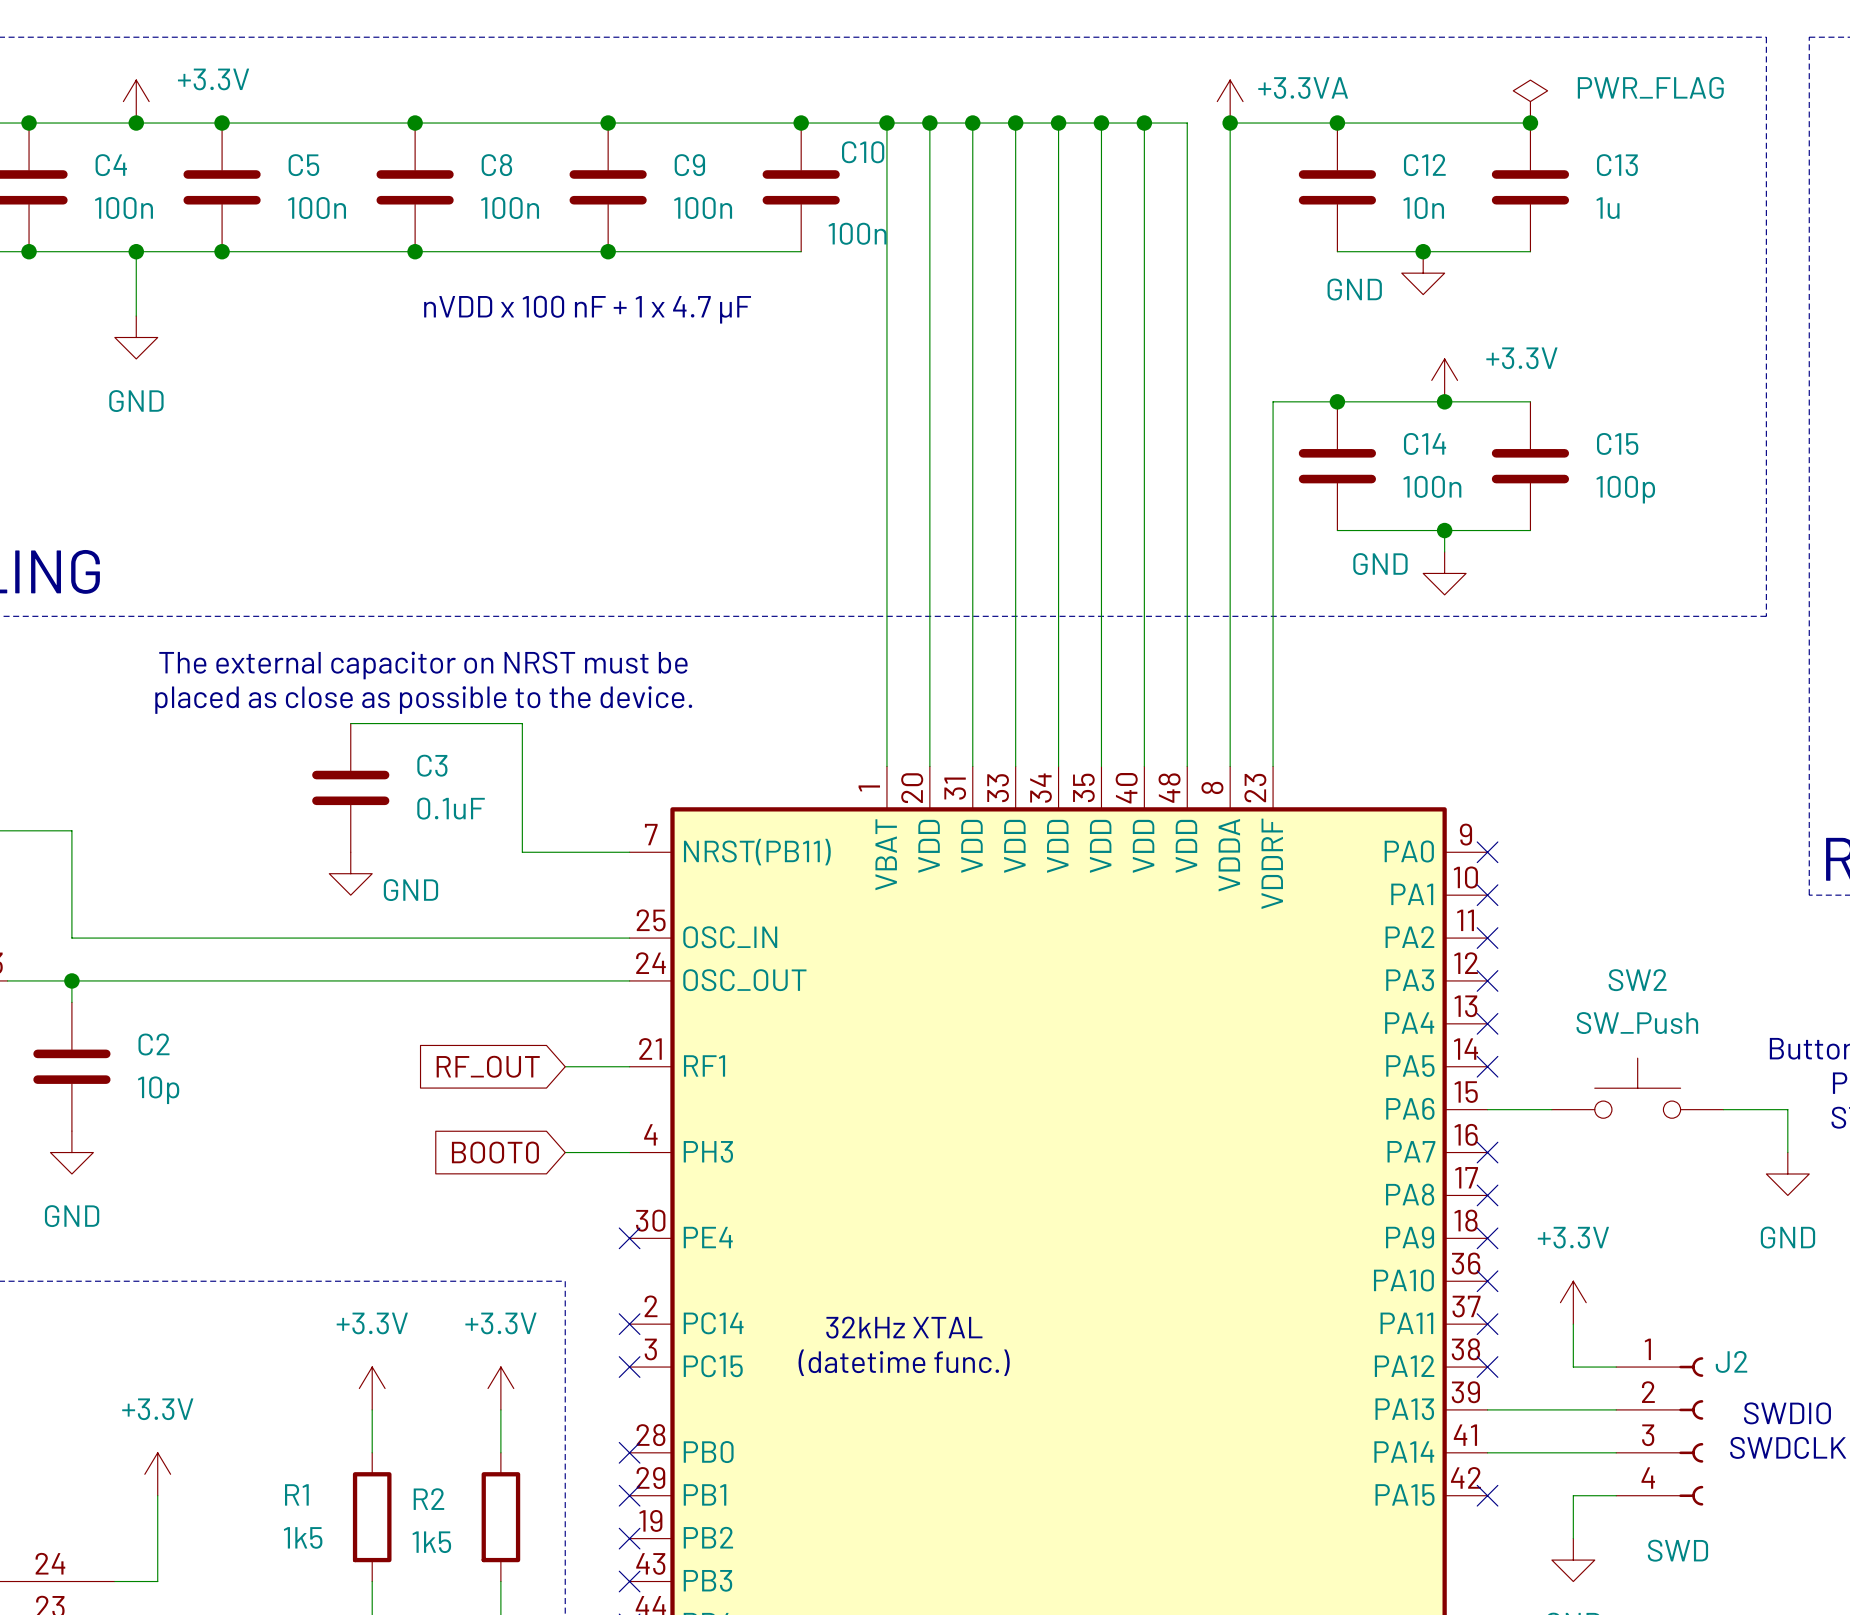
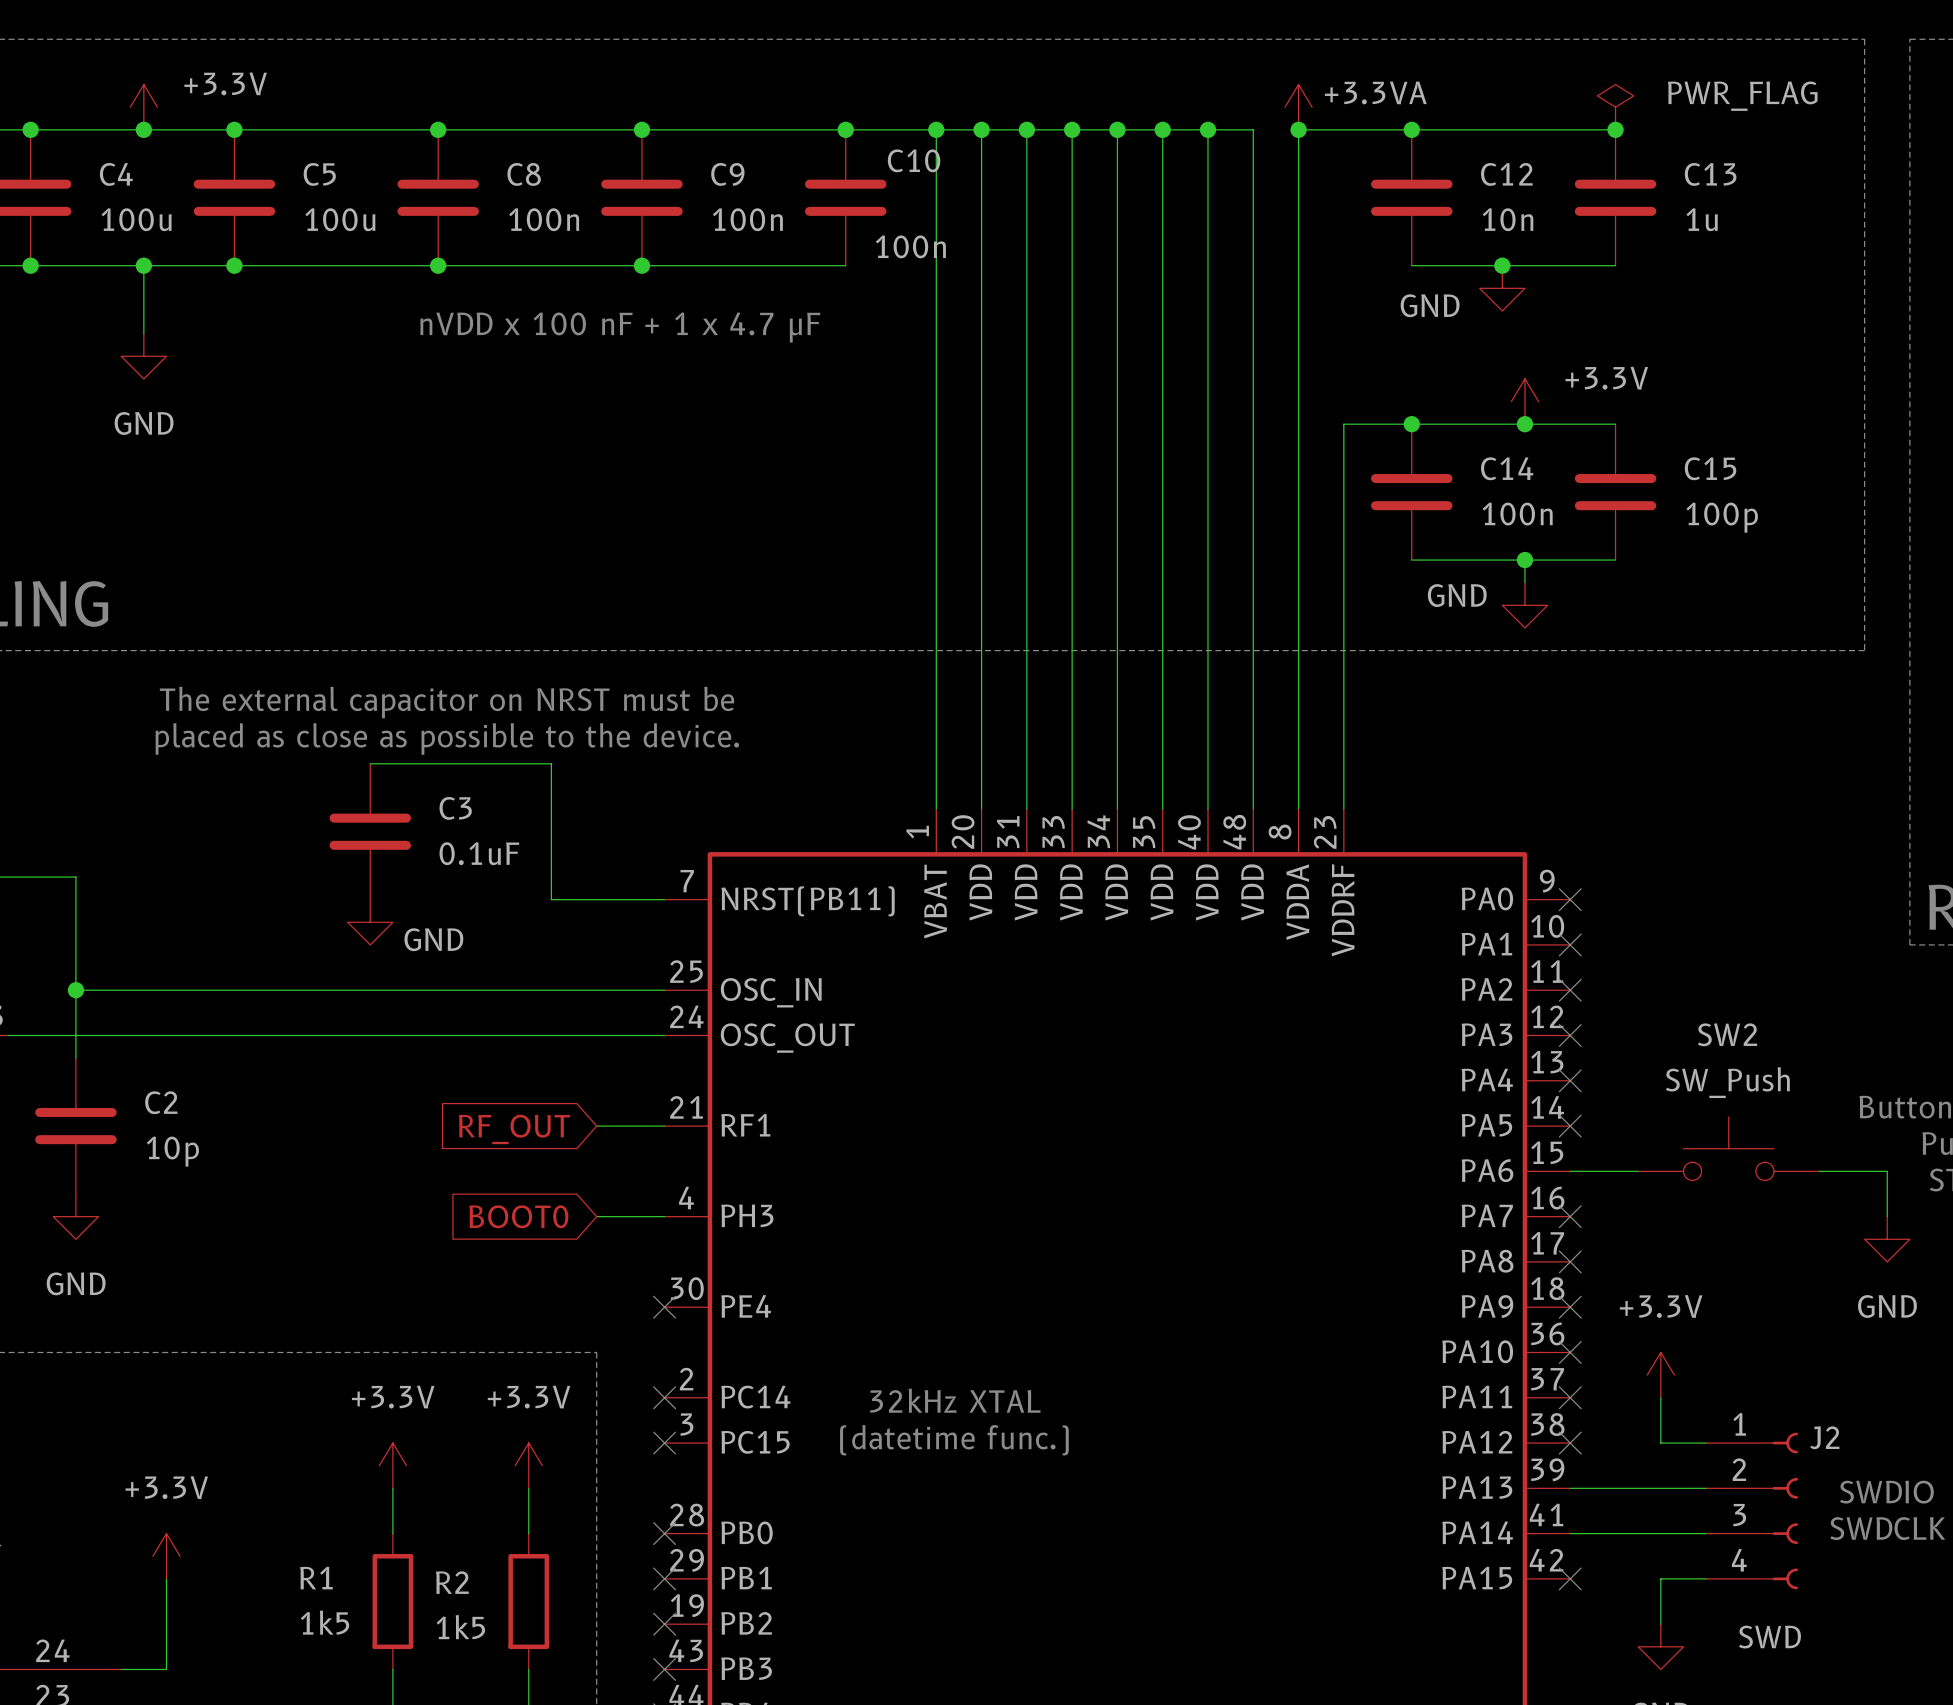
C4 value: 100n (124, 208) -> 100u (136, 219)
C5 value: 100n (317, 208) -> 100u (340, 219)
wire: none -> (75, 990) (75, 1035)
junction position: (71, 980) -> (75, 990)

